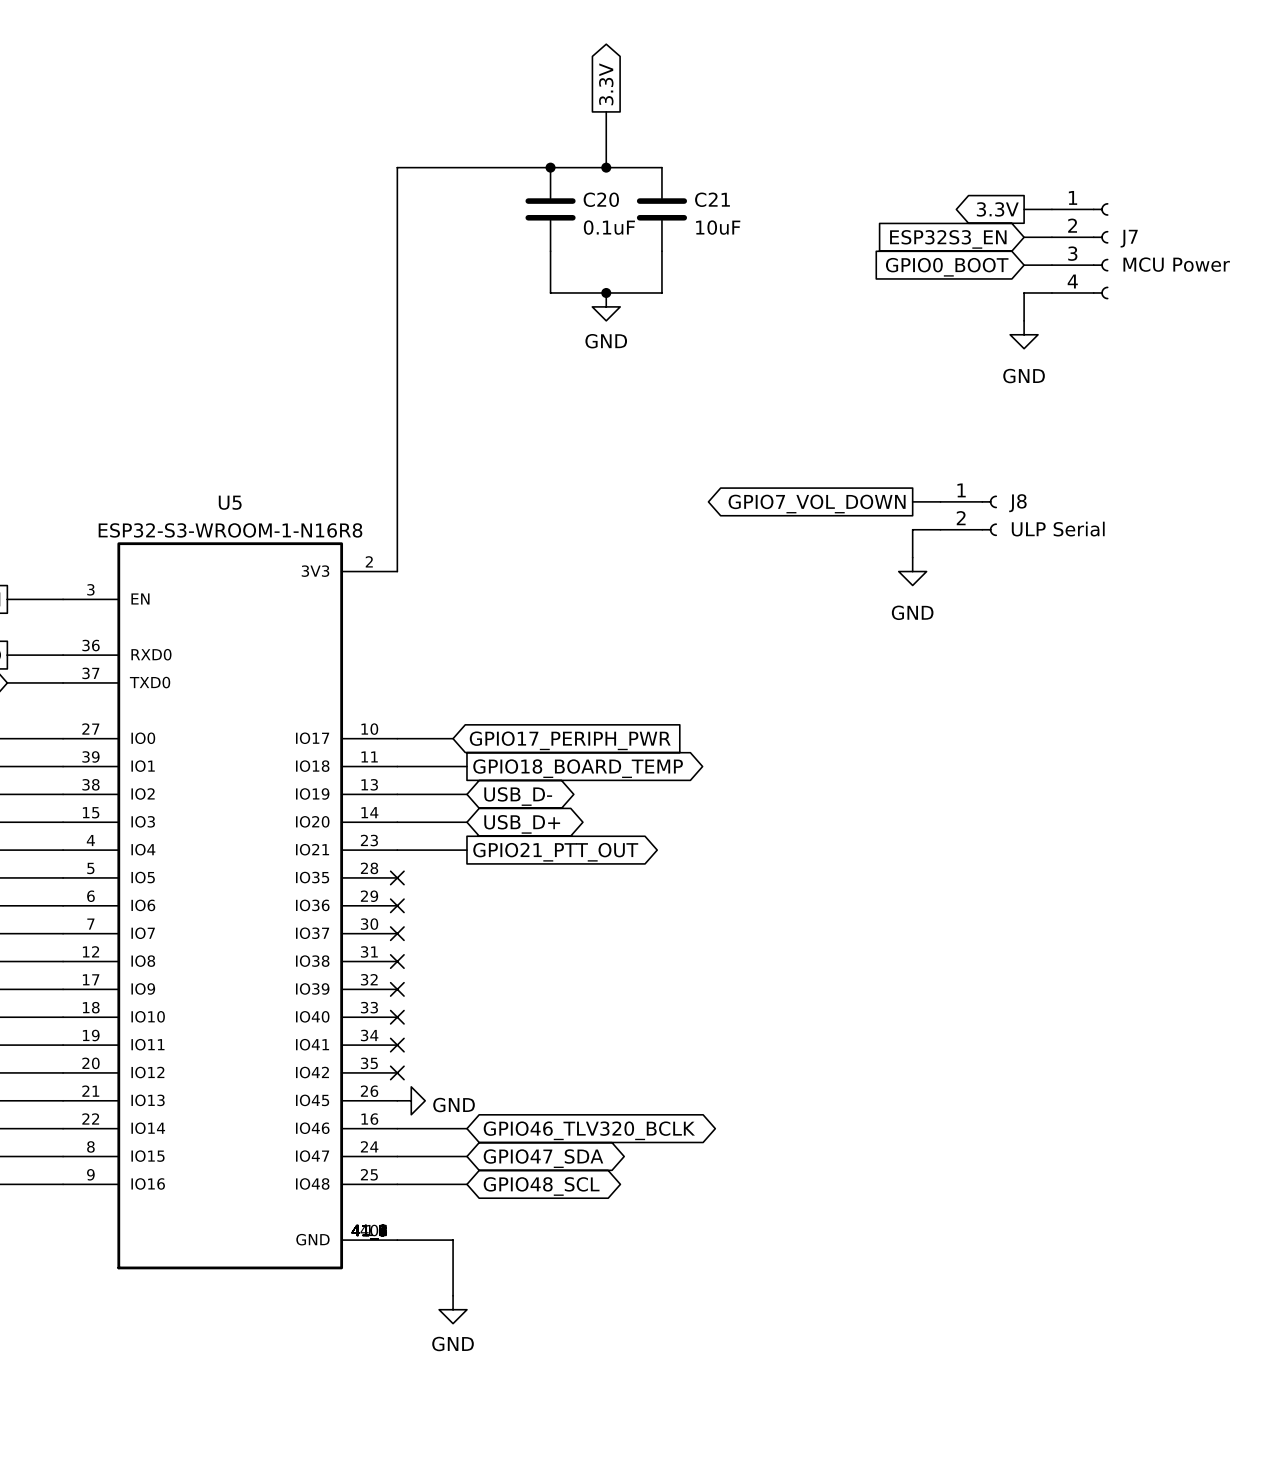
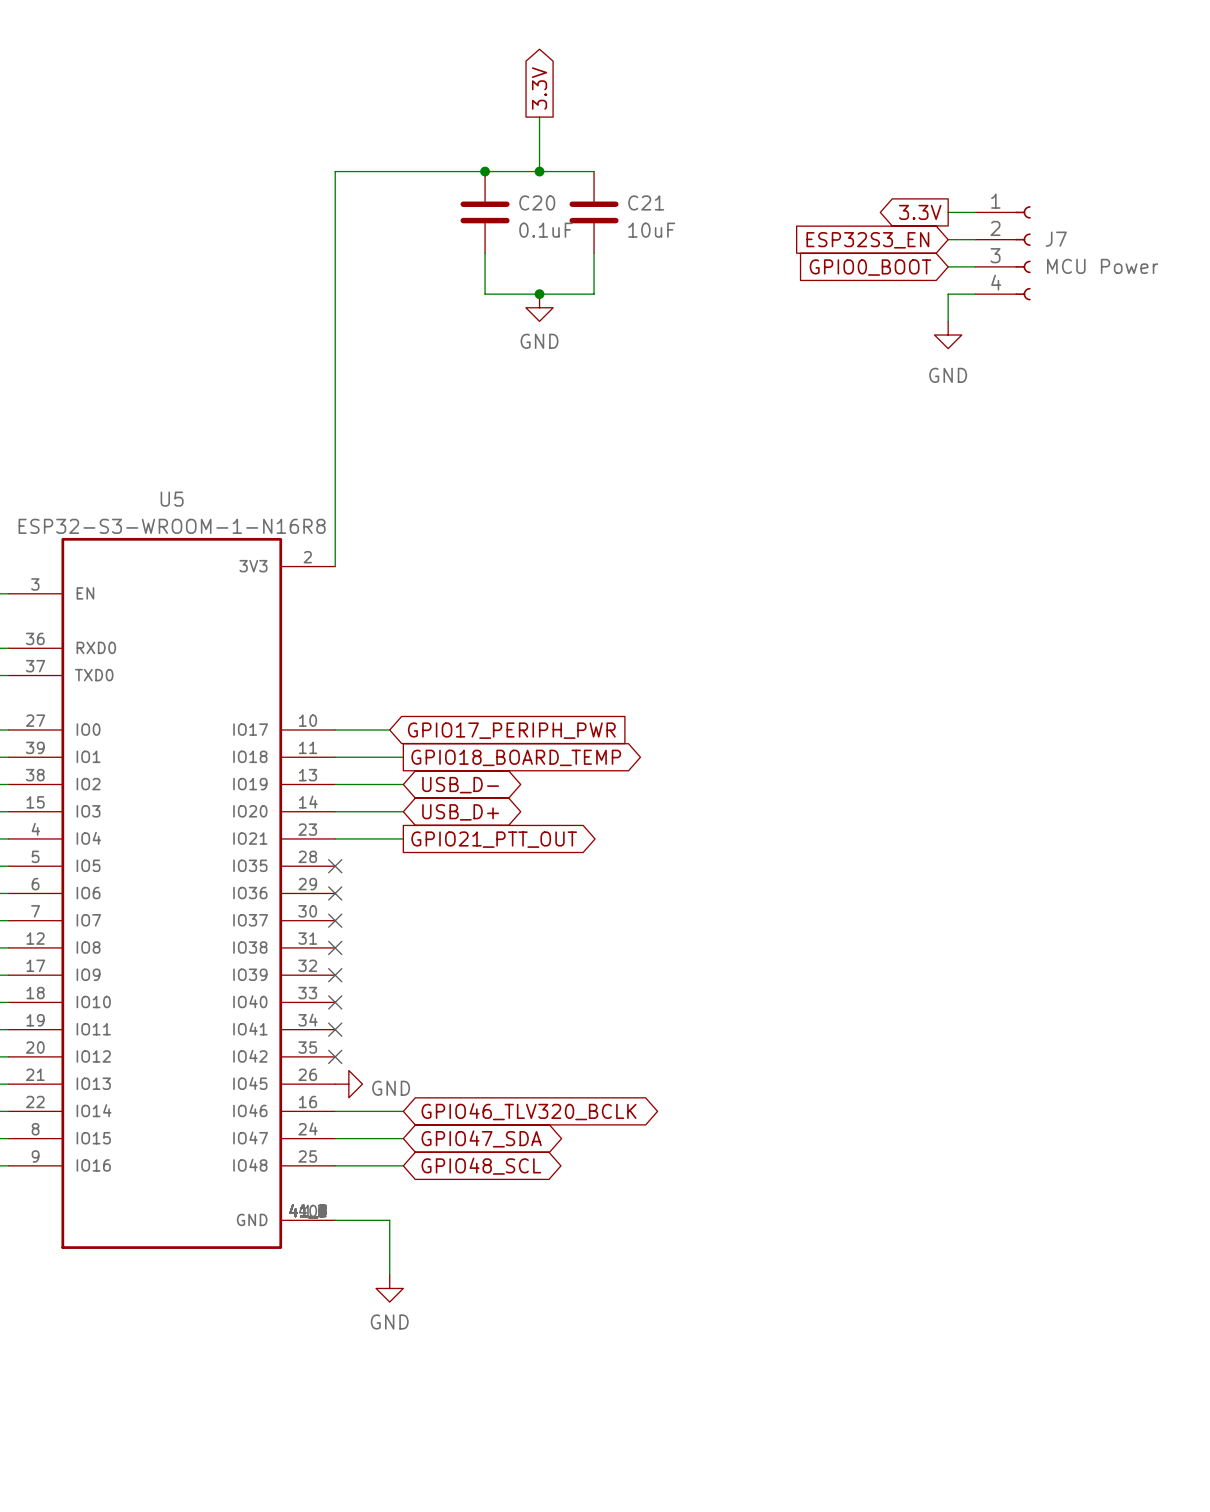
wire: (912, 501) (940, 501) -> none
global label: GPIO7_VOL_DOWN (817, 504) -> none
J8: ULP Serial (968, 515) -> none
wire: (940, 529) (912, 529) (912, 557) -> none
power symbol: GND (912, 571) -> none

